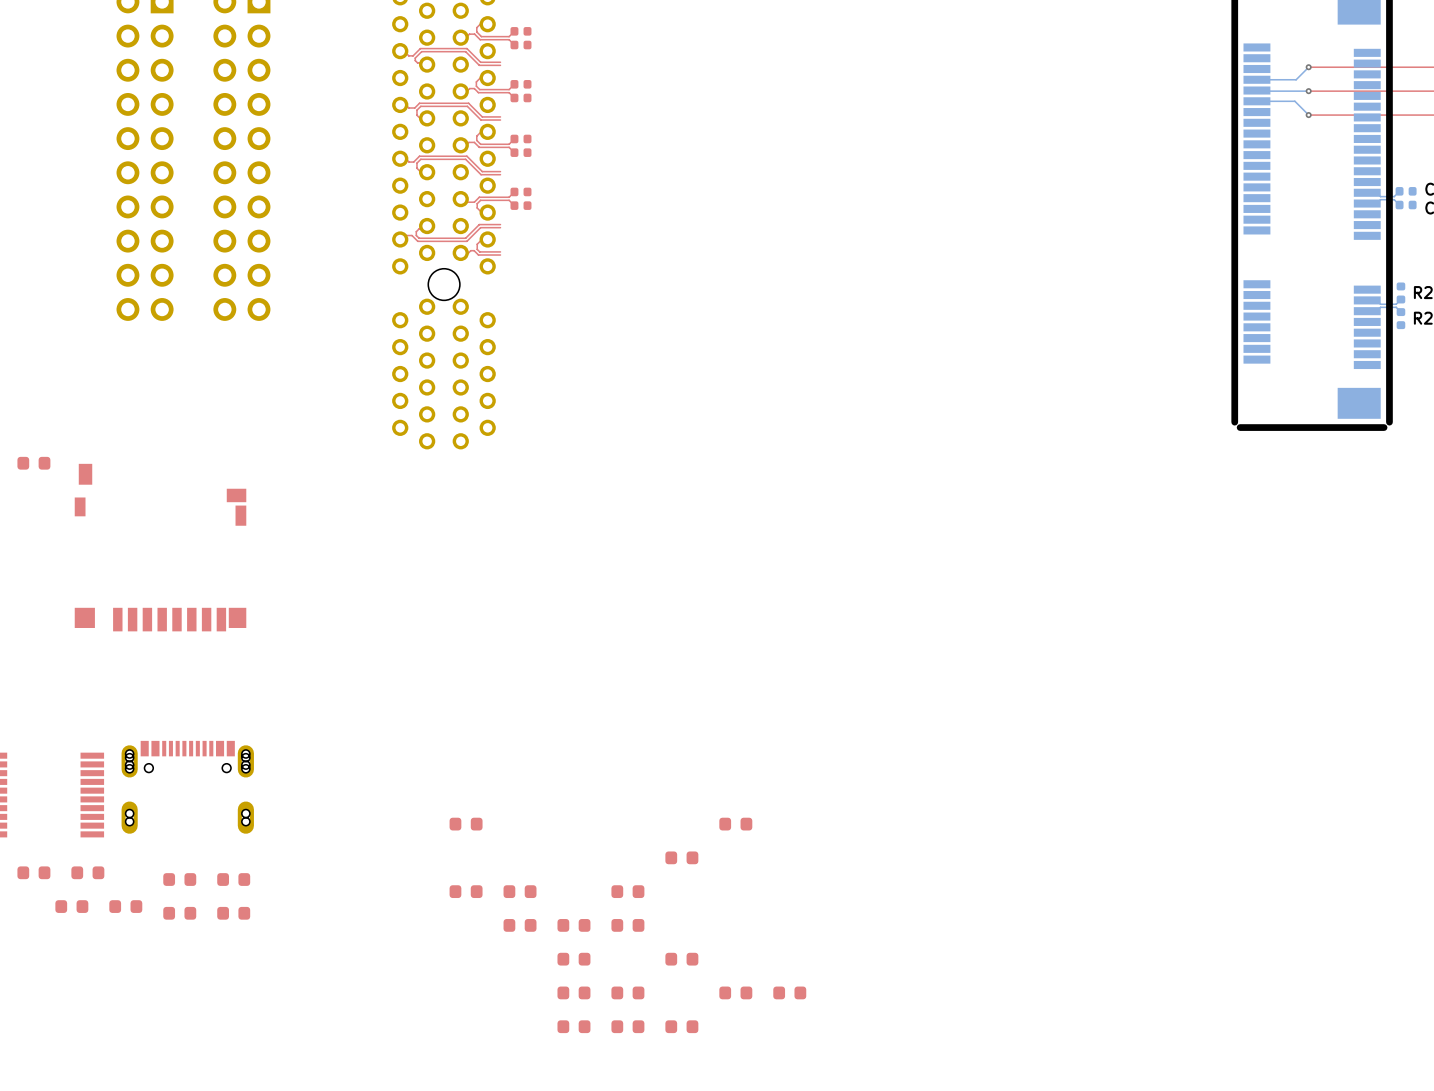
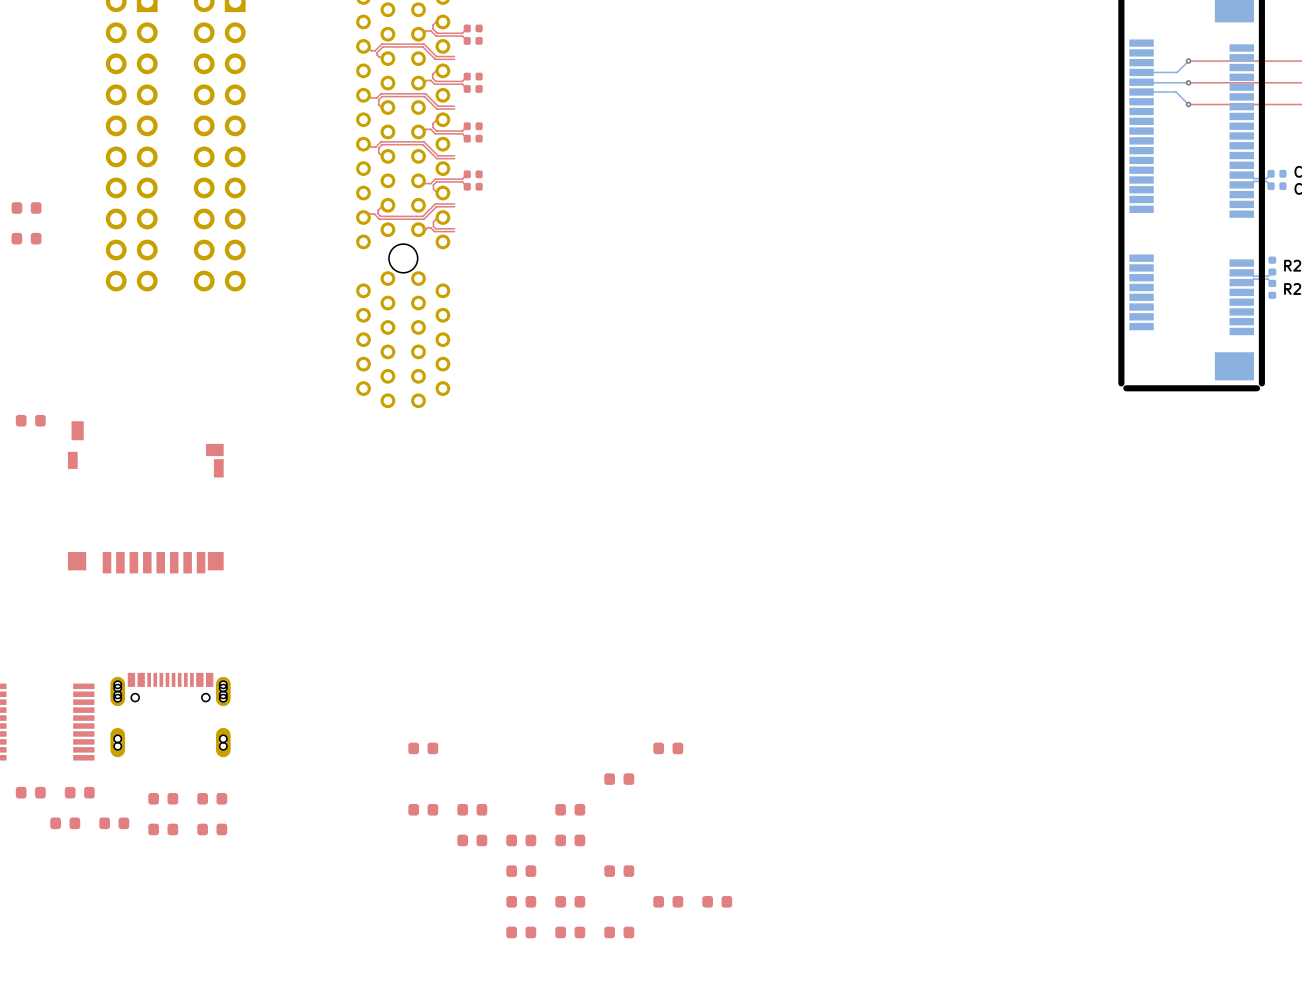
part: none -> (26, 207)
part: none -> (26, 238)

